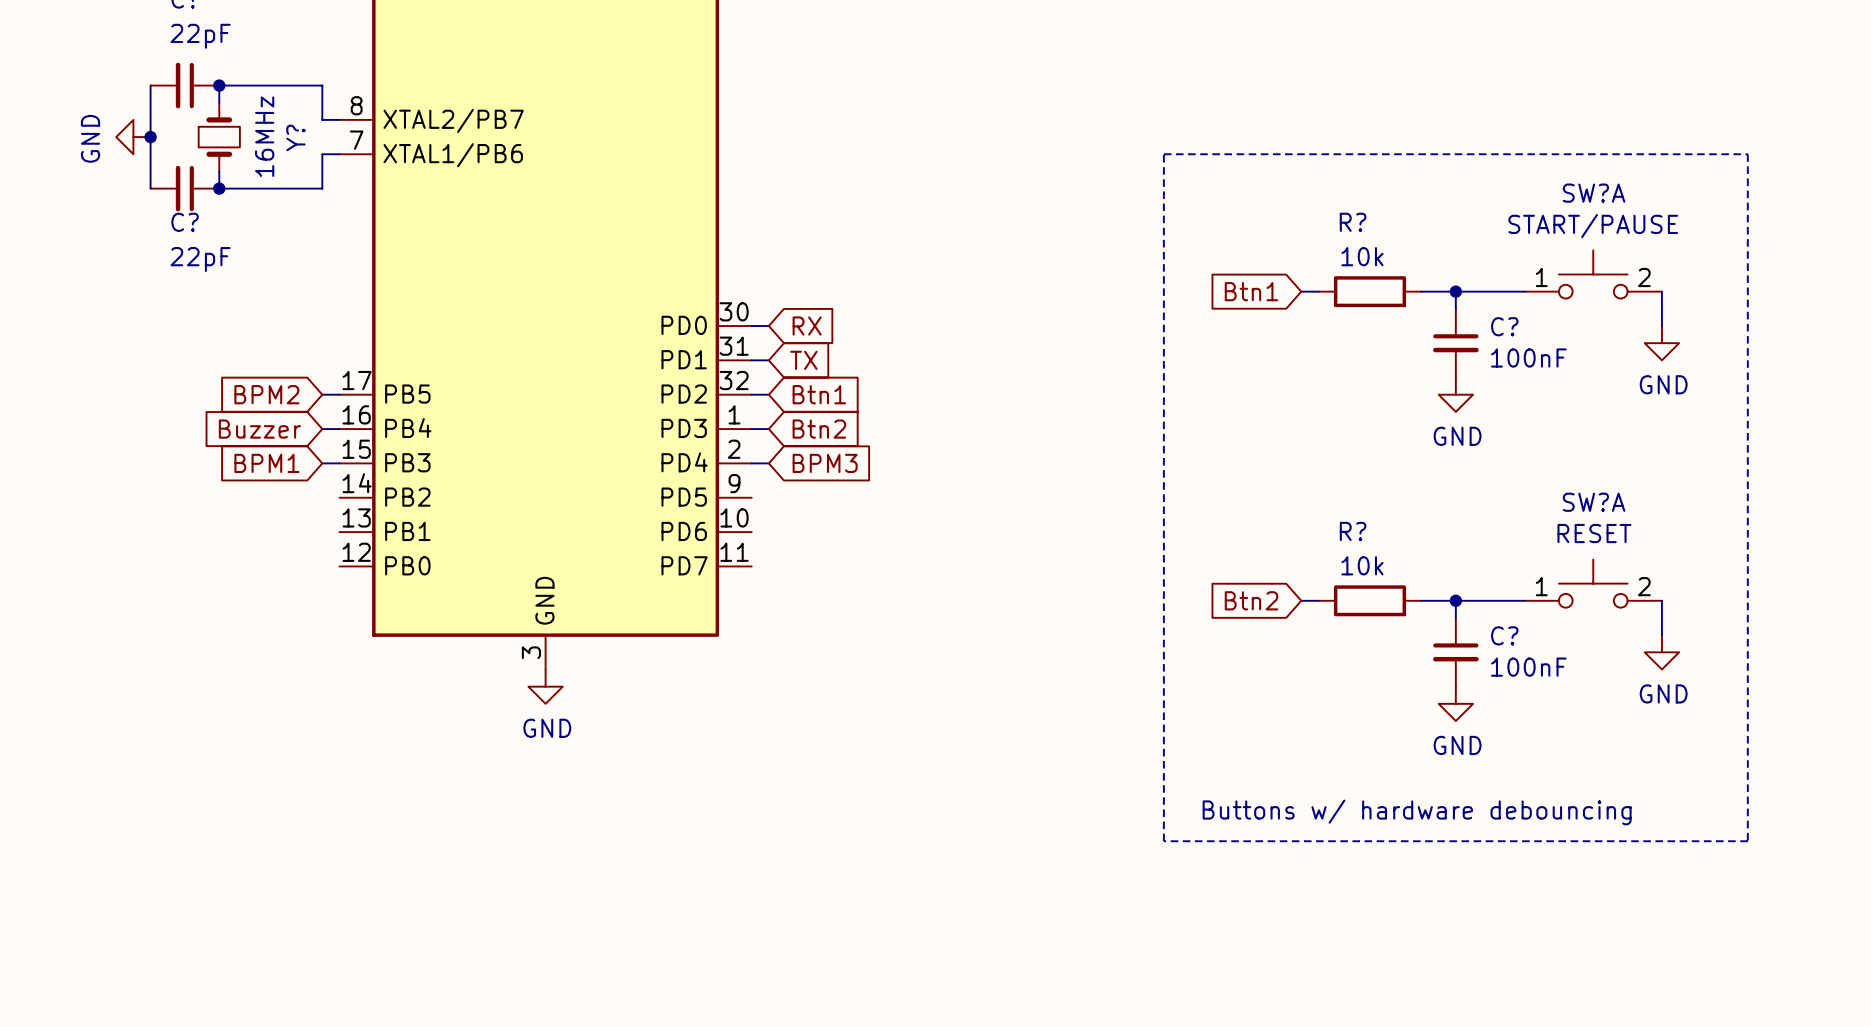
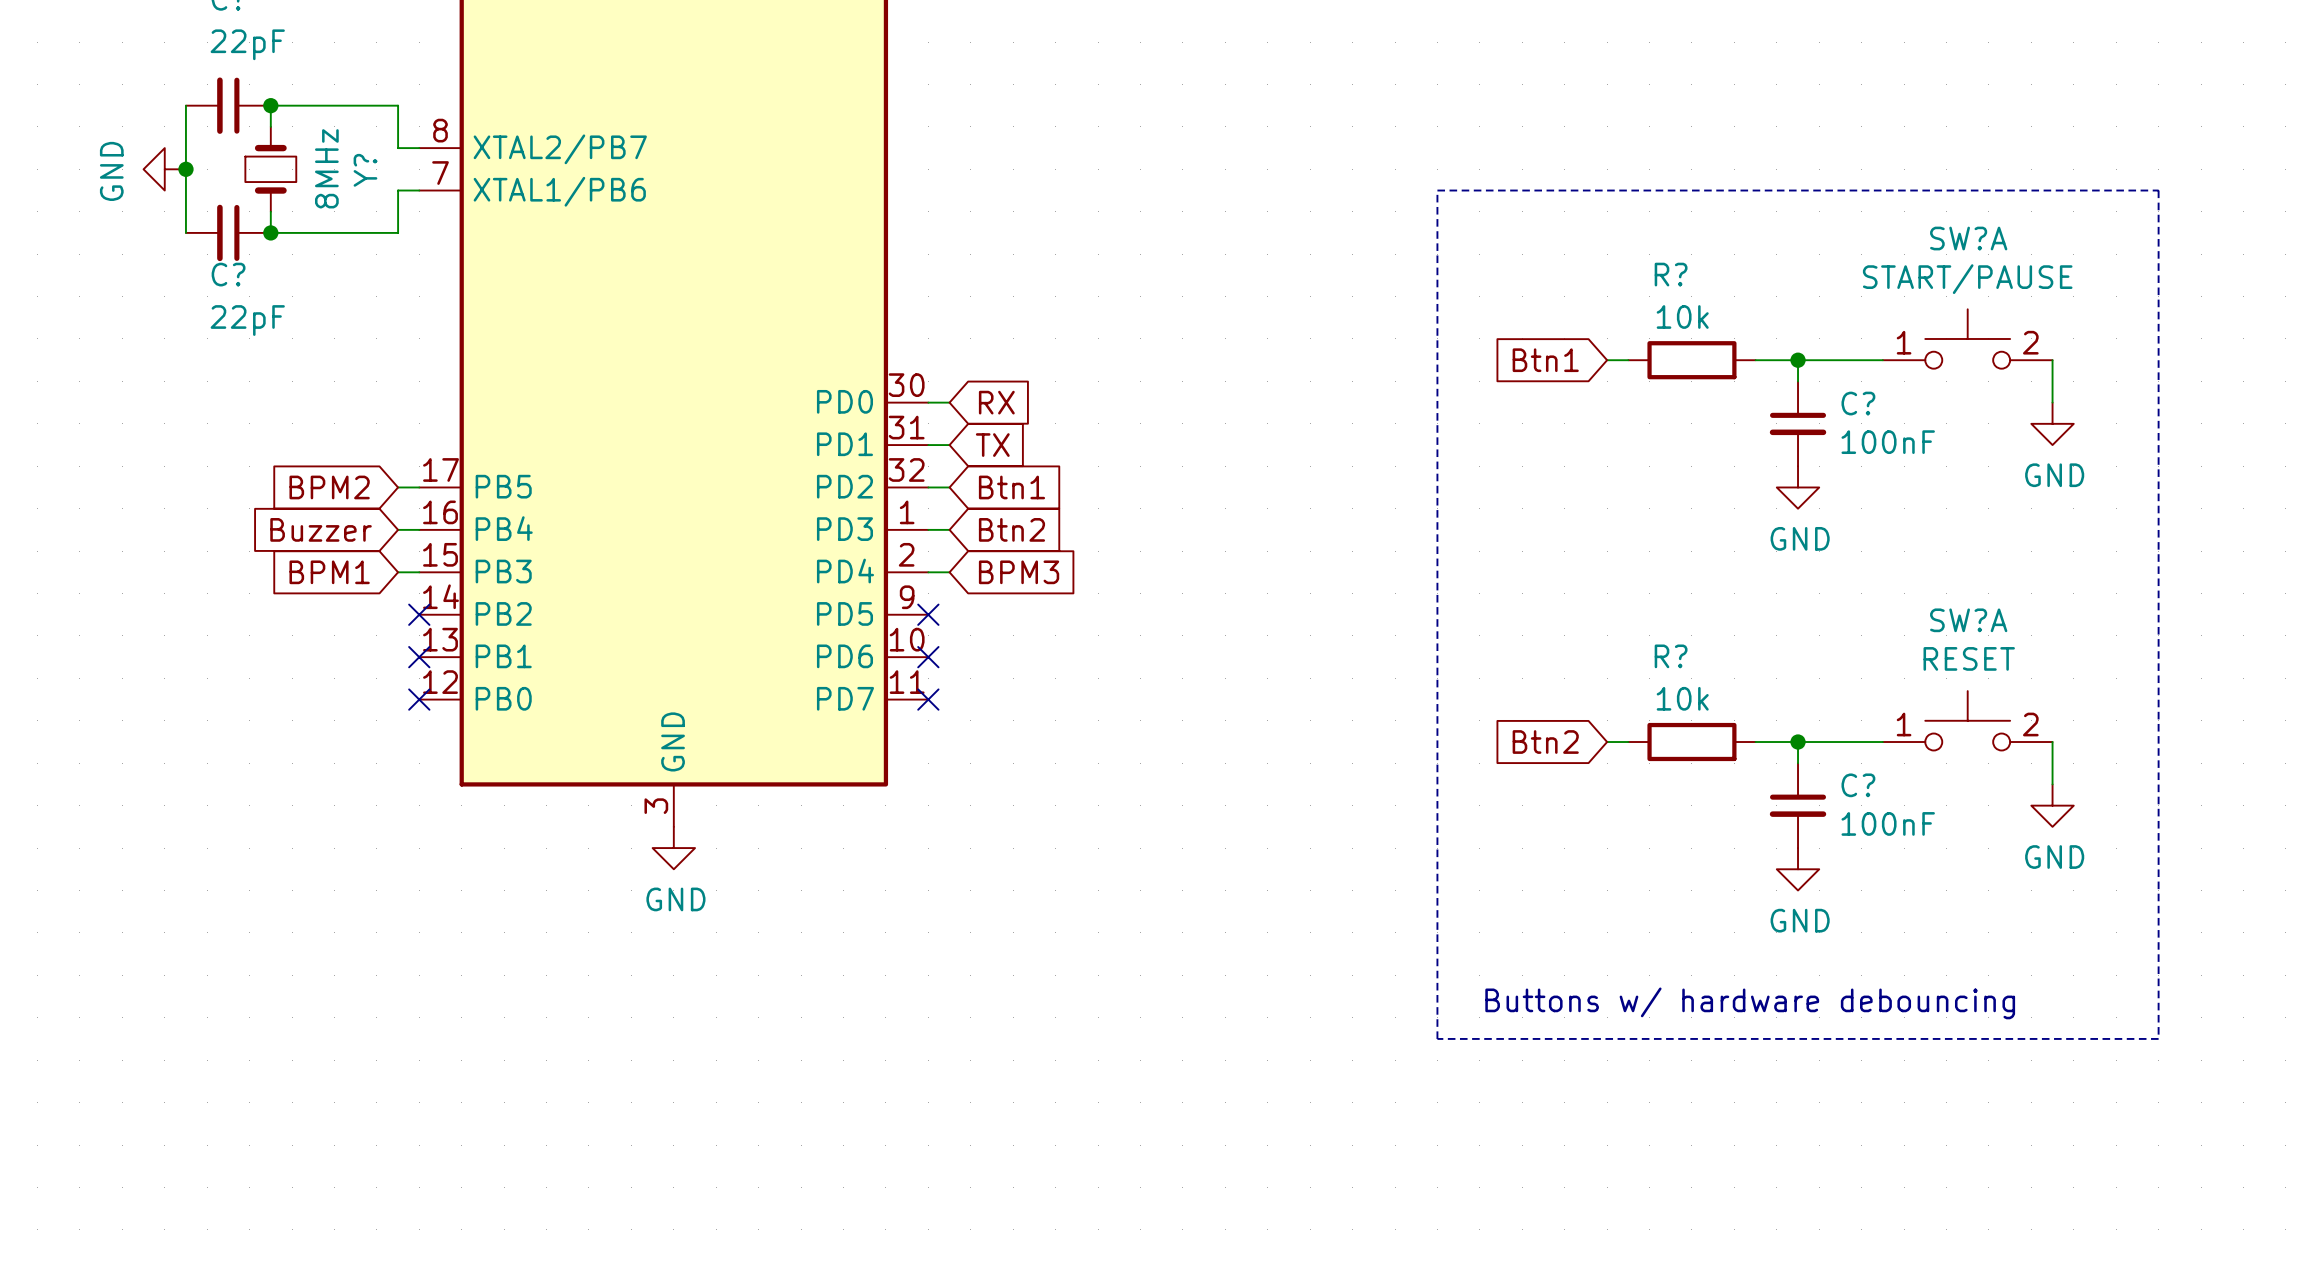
Y? value: 16MHz (264, 136) -> 8MHz (326, 168)
no-connect mark: none -> (419, 614)
no-connect mark: none -> (928, 614)
no-connect mark: none -> (419, 657)
no-connect mark: none -> (928, 657)
no-connect mark: none -> (419, 699)
no-connect mark: none -> (928, 699)

